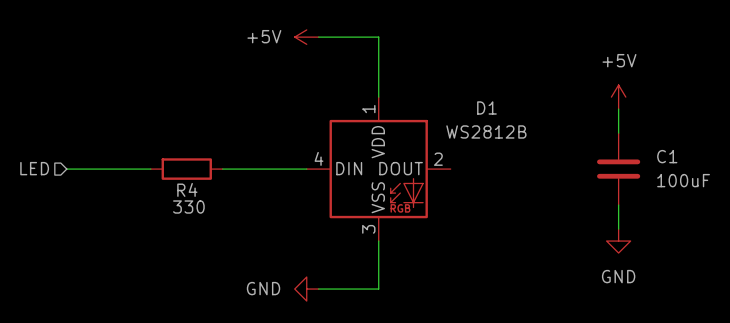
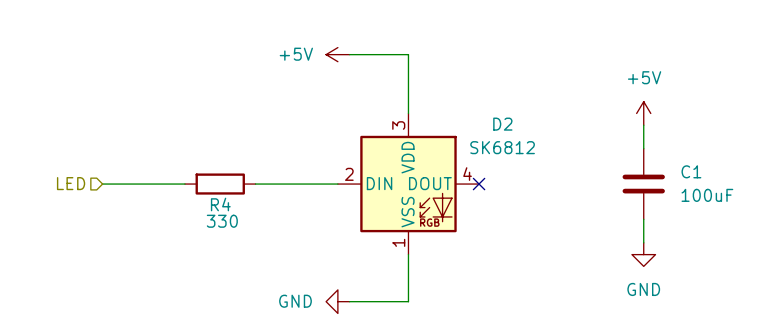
D1 name: D1 (486, 107) -> D2 (502, 124)
D1 pin number: 1 (368, 109) -> 3 (398, 125)
D1 value: WS2812B (486, 131) -> SK6812 (502, 147)
D1 pin number: 4 (319, 158) -> 2 (349, 174)
D1 pin number: 2 (438, 159) -> 4 (467, 174)
no-connect mark: none -> (479, 184)
D1 pin number: 3 (368, 229) -> 1 (398, 242)

